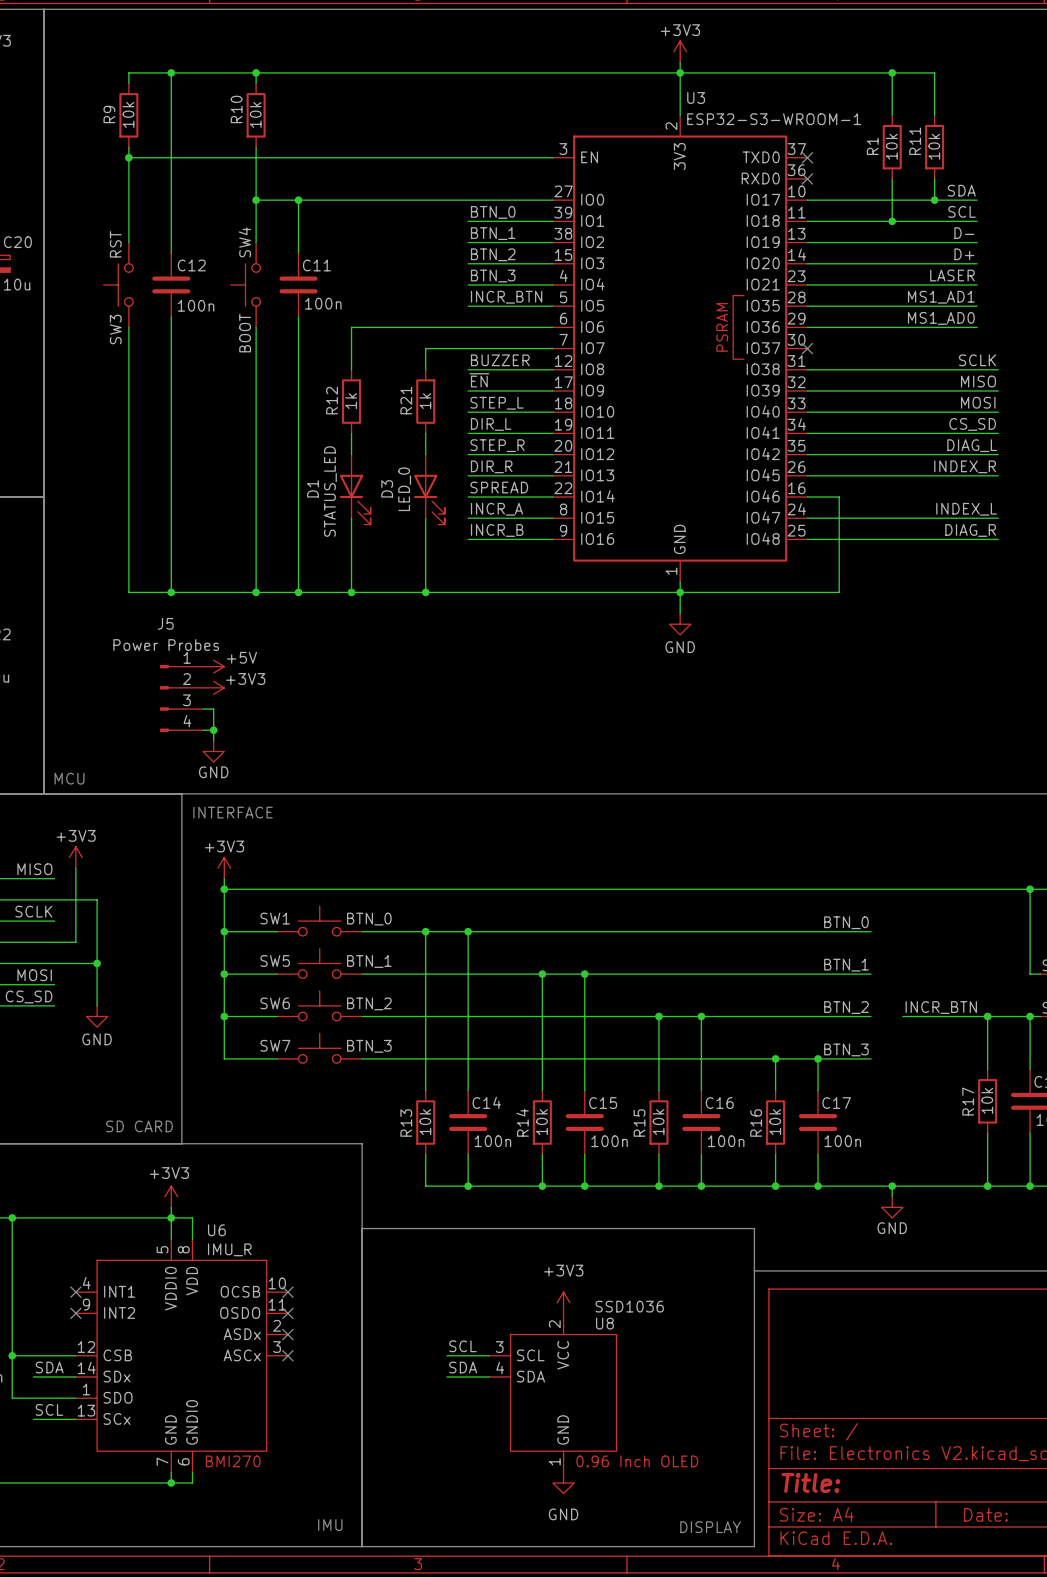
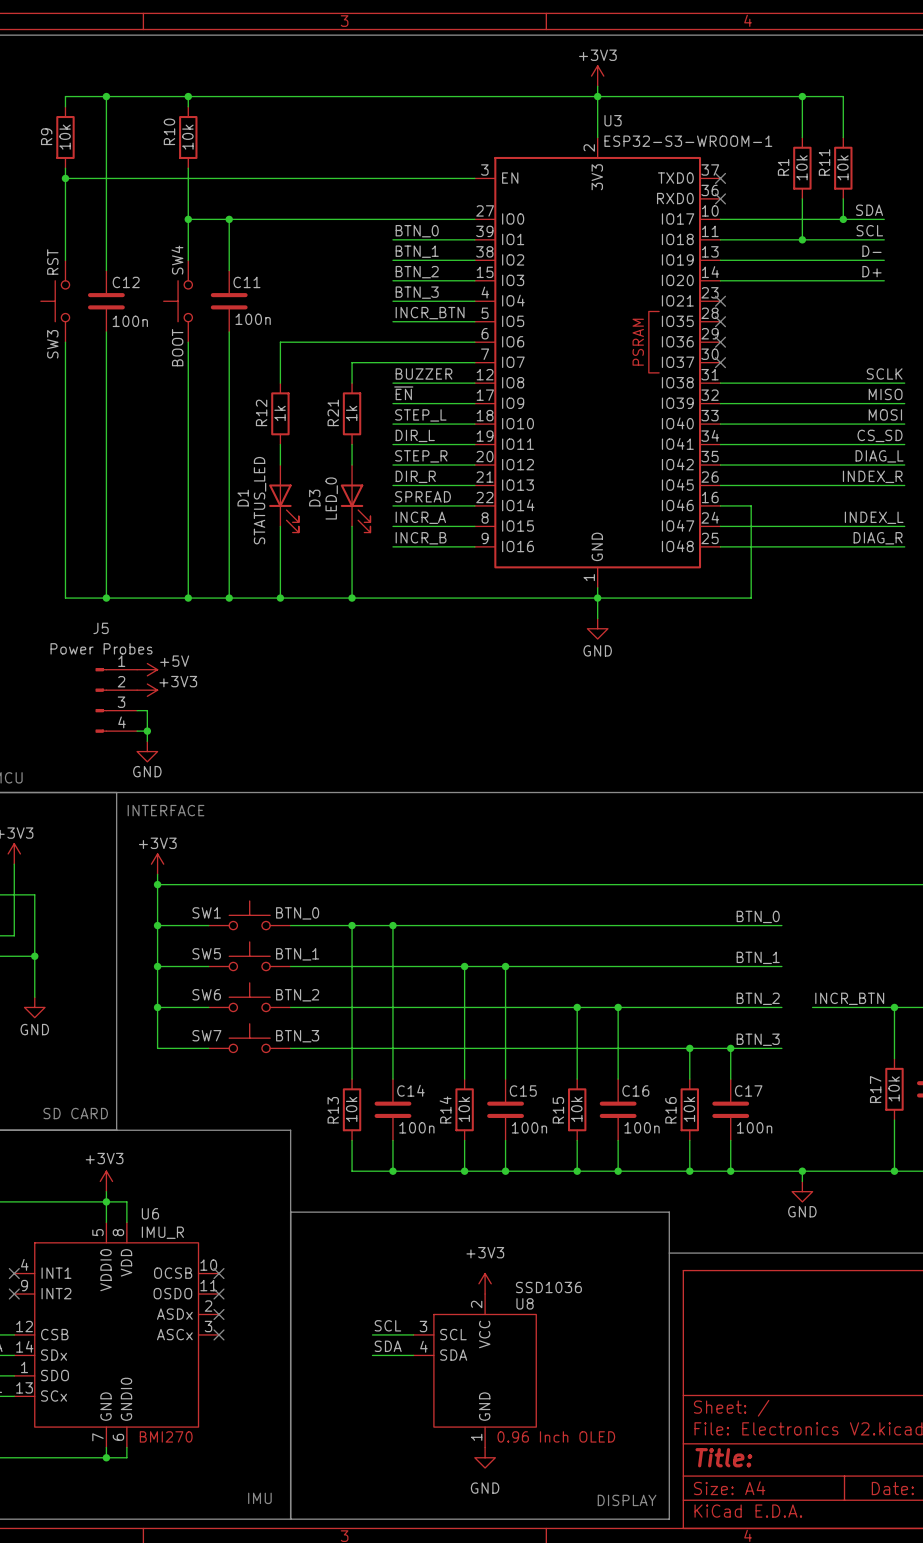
label: LASER (952, 275) -> none
wire: (807, 284) (977, 284) -> none
no-connect mark: none -> (720, 301)
label: MS1_AD1 (941, 297) -> none
wire: (807, 306) (977, 306) -> none
no-connect mark: none -> (720, 321)
label: MS1_AD0 (941, 318) -> none
wire: (807, 327) (977, 327) -> none
no-connect mark: none -> (720, 342)

